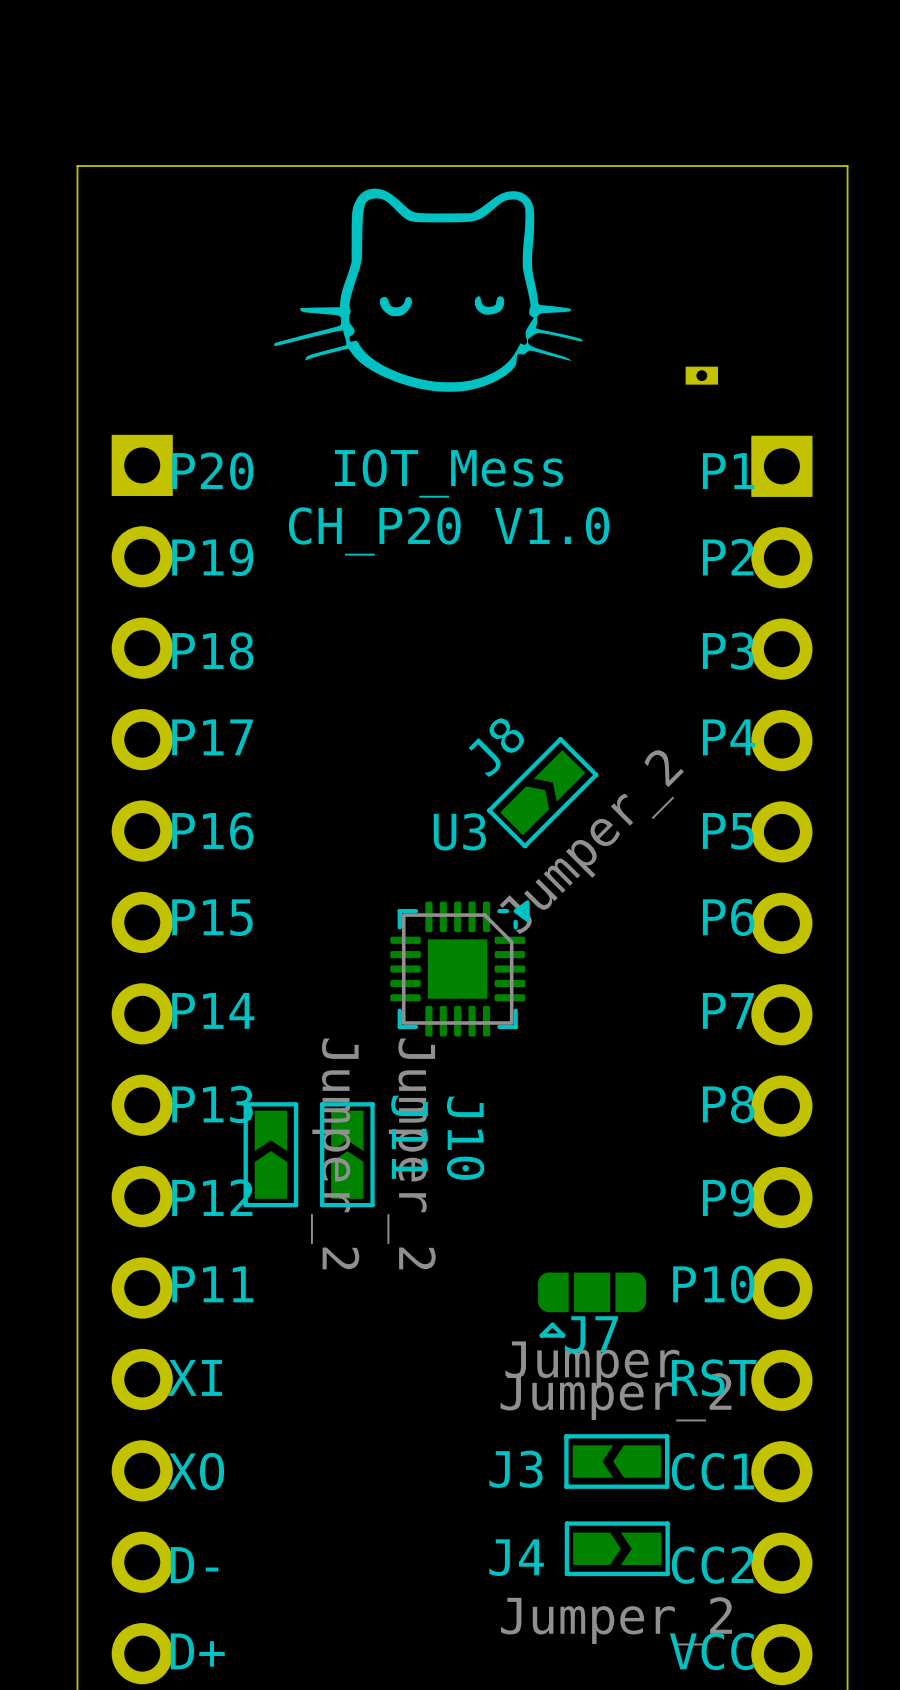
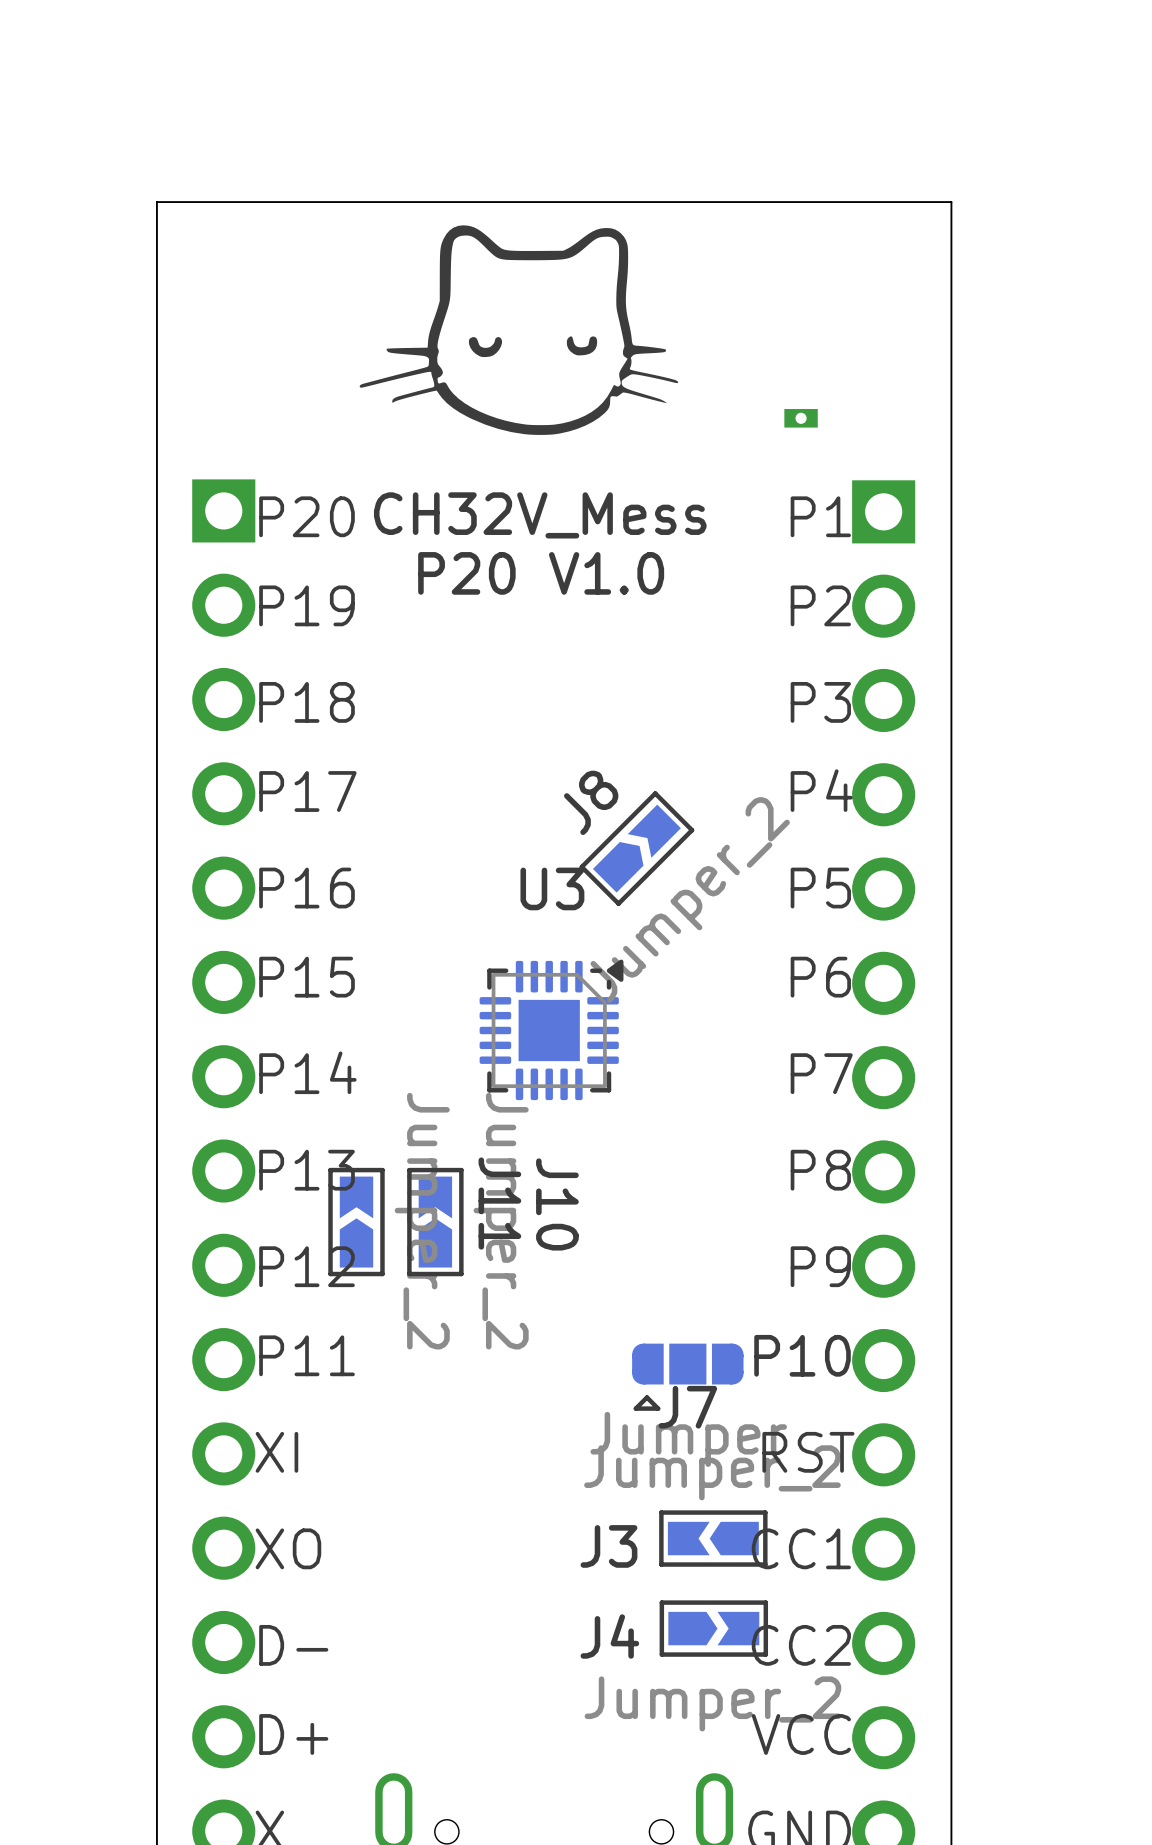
text: IOT_Mess (449, 473) -> CH32V_Mess (540, 515)
text: CH_P20 V1.0 (449, 531) -> P20 V1.0 (541, 573)

